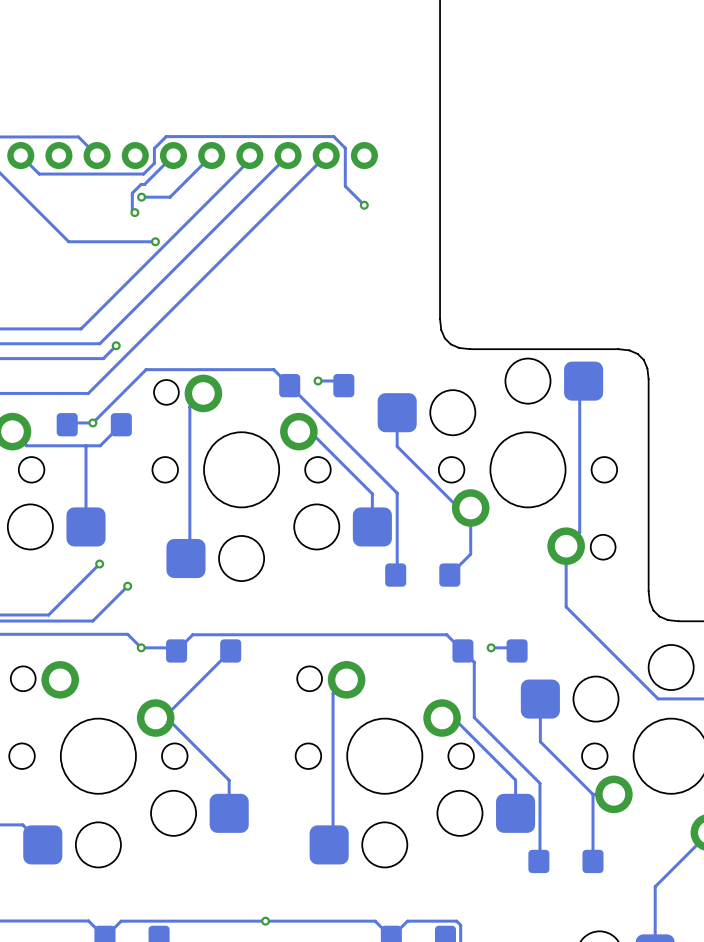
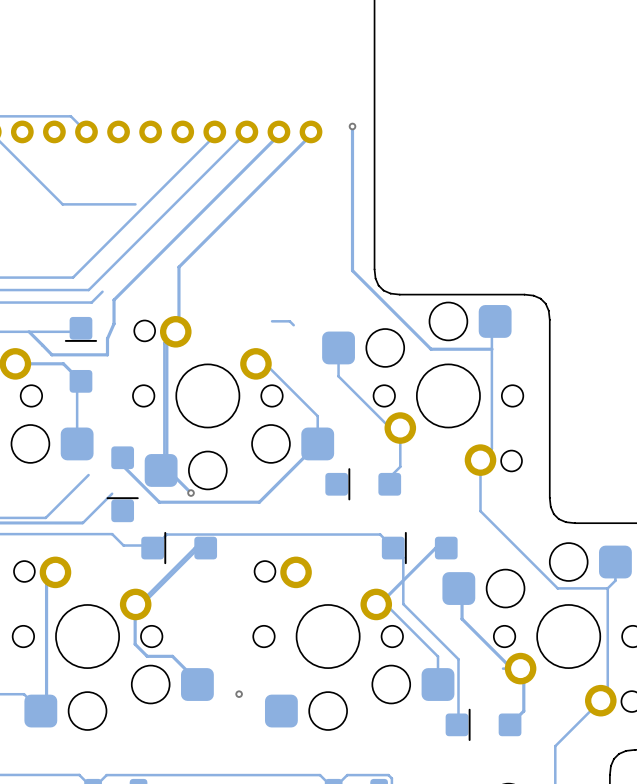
track: none -> (352, 126) (352, 270) (431, 349) (492, 349)
track: (20, 155) (39, 174) (143, 174) (154, 163) (154, 148) (166, 136) (333, 136) (345, 148) (345, 186) (364, 205) -> none
track: (173, 155) (144, 184) (141, 184) (132, 193) (132, 210) (134, 212) -> none
track: (211, 155) (170, 197) (141, 197) -> none
track: (326, 155) (88, 393) -> none
track: none -> (282, 131) (114, 299) (114, 323) (107, 338) (107, 354) (51, 354) (29, 331)
track: none -> (314, 131) (178, 267) (178, 331) (166, 343) (166, 467) (164, 470) (168, 470) (191, 493)
via: (141, 197) -> none
via position: (364, 205) -> (352, 126)
via: (134, 212) -> none
via: (155, 241) -> none
via: (116, 345) -> none
via: (318, 380) -> none
part: (316, 385) -> none
part footprint: [56, 413, 132, 437] -> [64, 316, 98, 393]
via: (92, 422) -> none
track: (67, 424) (68, 422) (92, 422) (146, 369) (273, 369) (397, 493) (395, 575) -> none
track: (121, 424) (100, 445) (26, 445) (12, 431) -> none
track: none -> (18, 363) (63, 363) (80, 381)
track: none -> (320, 443) (317, 443) (259, 502) (159, 502) (122, 465) (122, 457)
via: (99, 563) -> none
part footprint: [385, 563, 461, 587] -> [325, 468, 402, 501]
part: none -> (122, 484)
via: none -> (191, 493)
via: (127, 586) -> none
part footprint: [166, 639, 242, 663] -> [141, 531, 218, 565]
part footprint: [452, 639, 528, 663] -> [381, 531, 458, 565]
via: (141, 647) -> none
track: (491, 647) (513, 647) (517, 650) -> none
via: (491, 647) -> none
track: none -> (205, 548) (195, 548) (135, 608) (135, 644) (147, 656) (172, 656) (200, 684)
track: none -> (446, 548) (435, 548) (379, 604)
track: none -> (58, 572) (46, 584) (46, 708) (44, 710)
track: (346, 679) (333, 693) (333, 841) (329, 844) -> none
track: none -> (462, 588) (462, 618) (511, 668)
track: (540, 699) (540, 741) (593, 794) (593, 861) -> none
track: (165, 716) (229, 780) (229, 813) -> none
track: none -> (523, 668) (523, 711) (510, 724)
via: none -> (239, 694)
part footprint: [528, 849, 604, 874] -> [445, 708, 522, 741]
via: (265, 921) -> none

